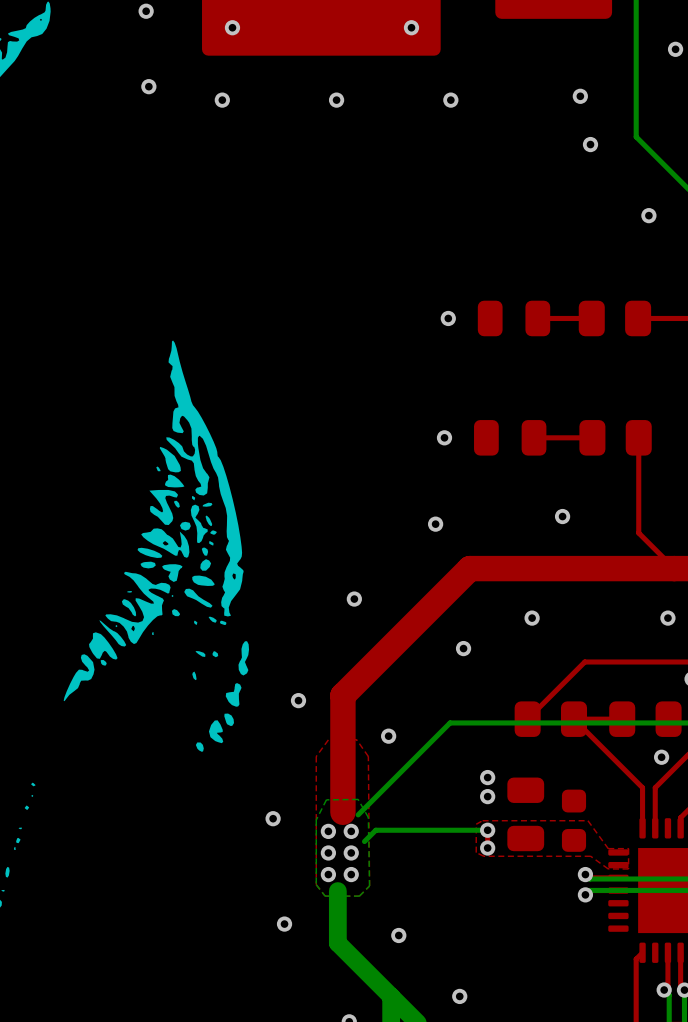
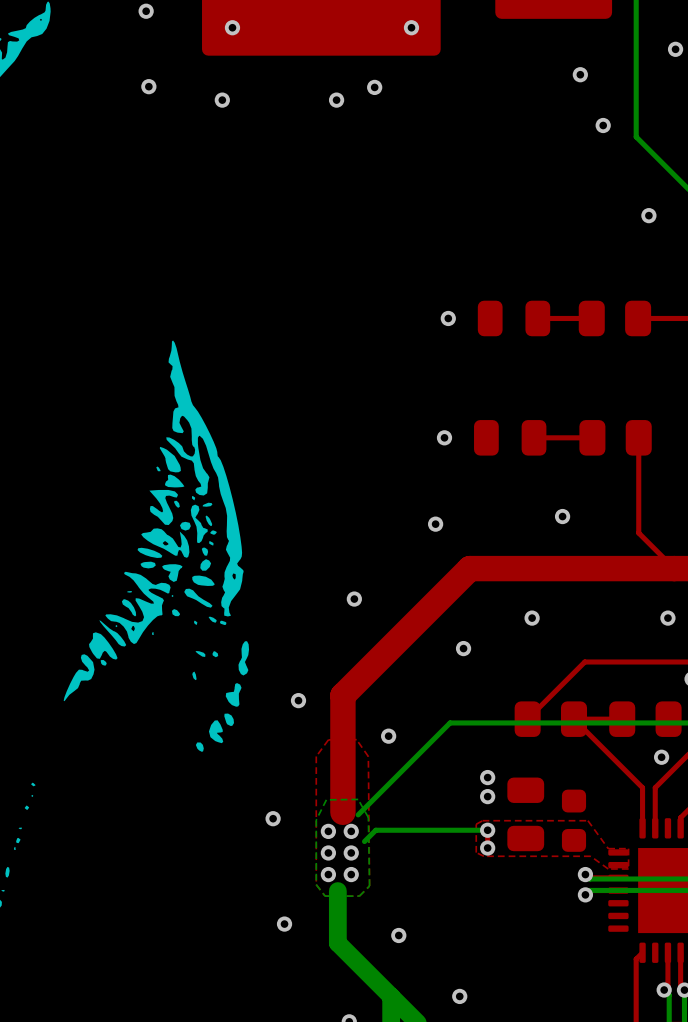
via: none -> (580, 74)
via: none -> (374, 87)
via: (580, 96) -> none
via: (450, 100) -> none
via: none -> (603, 125)
via: (590, 144) -> none

